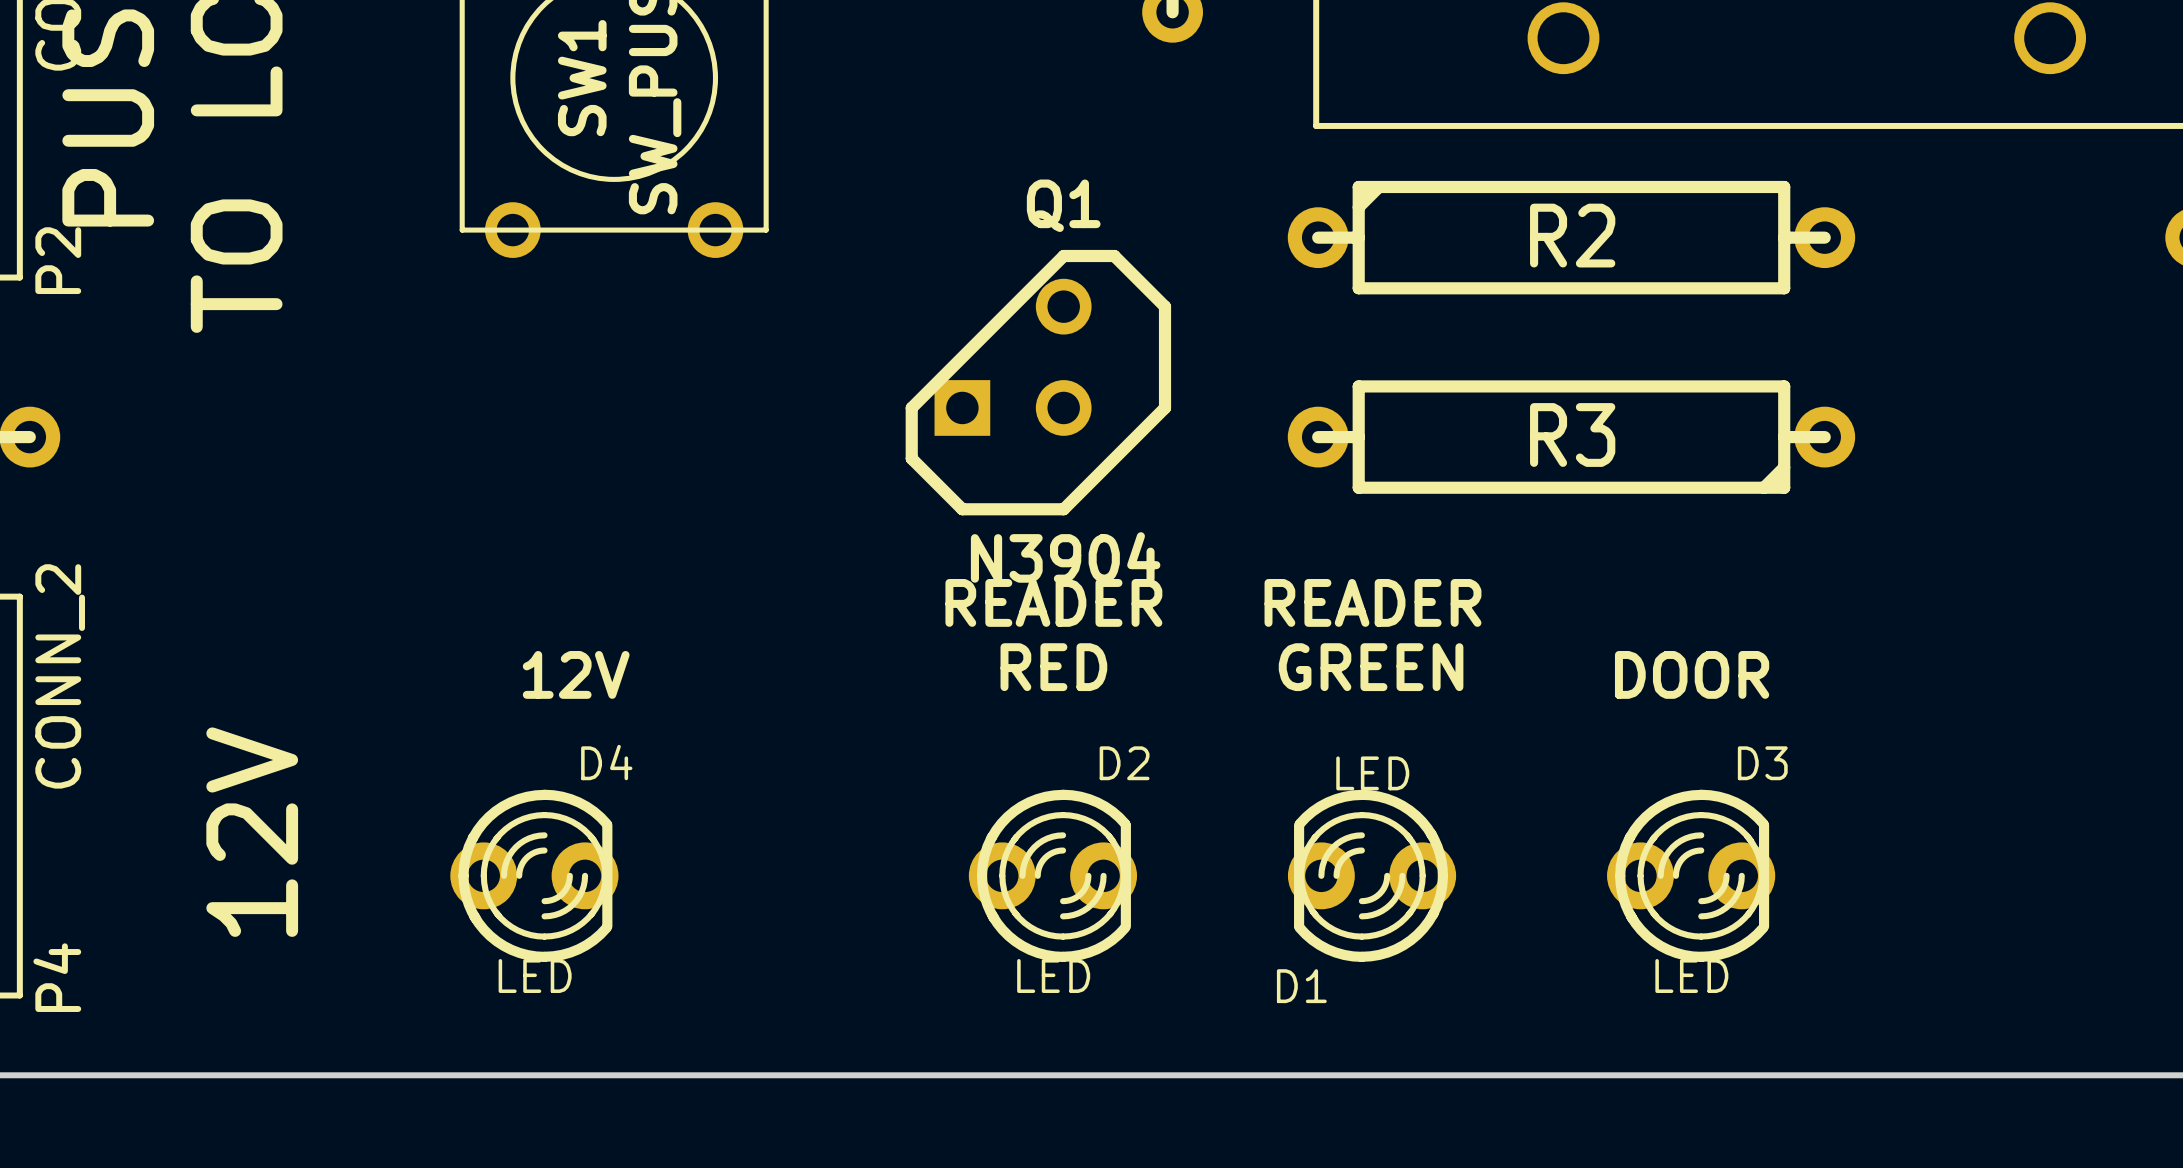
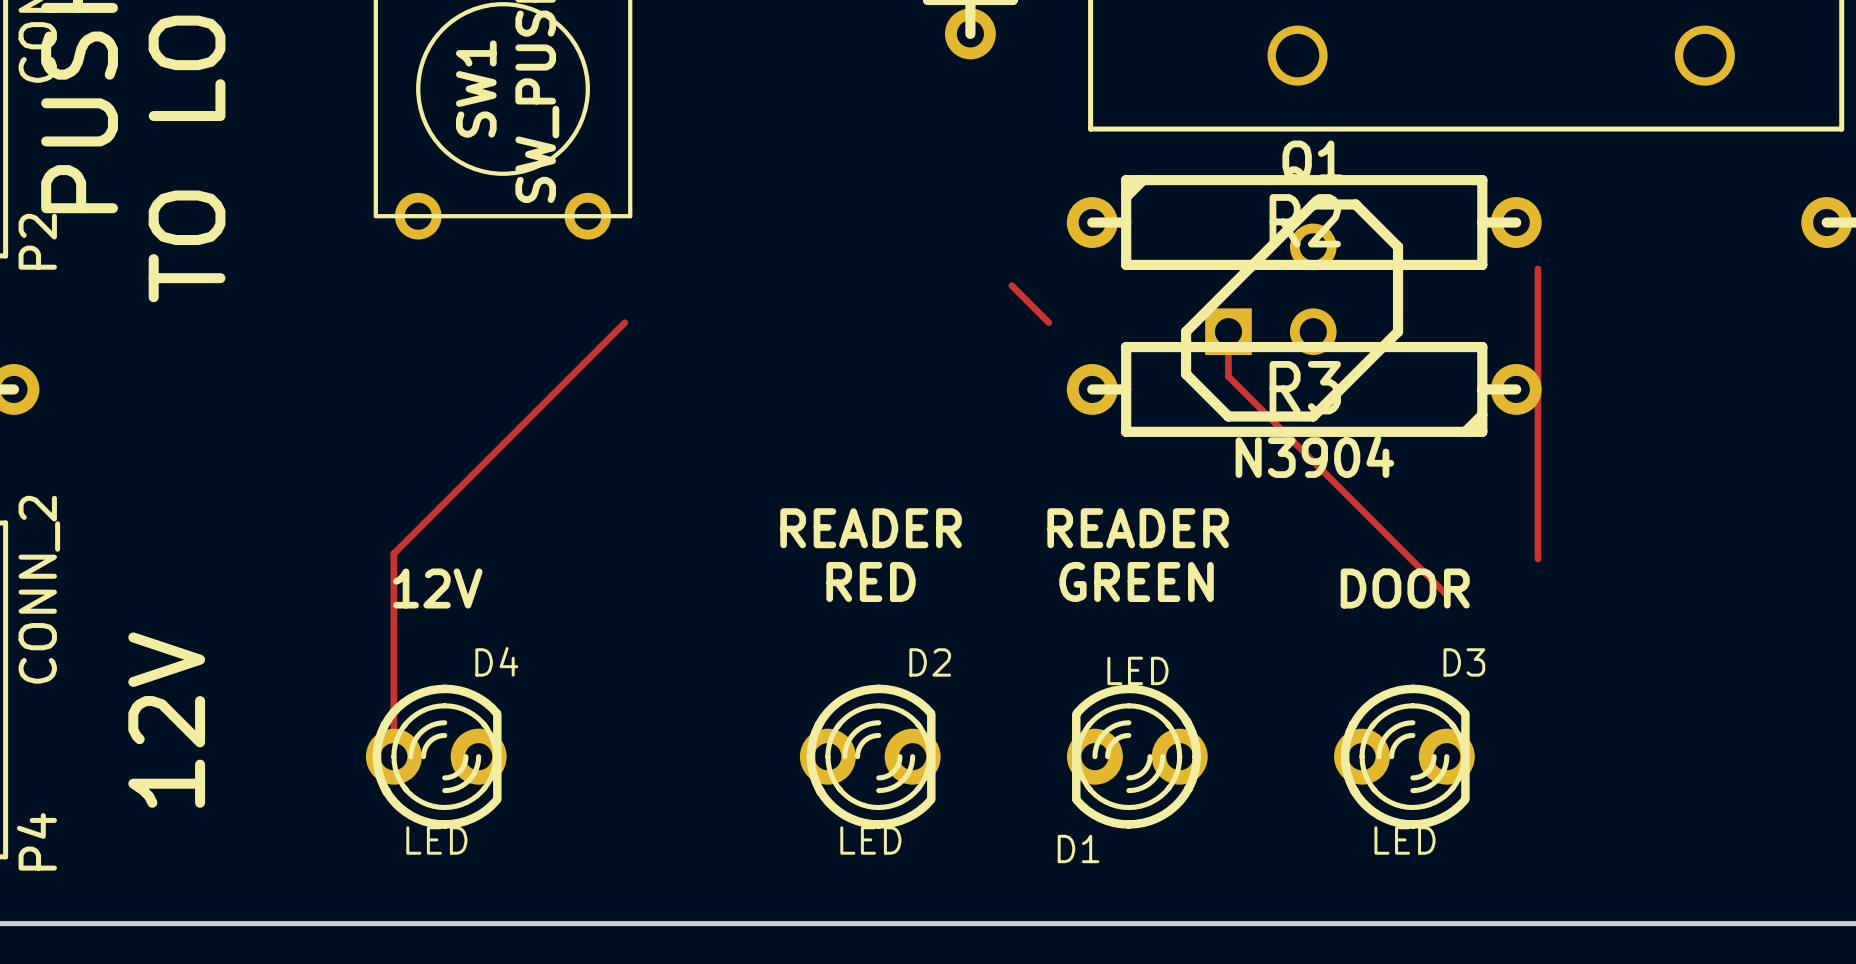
top track: none -> (1537, 268) (1537, 559)
top track: none -> (1011, 285) (1048, 322)
top track: none -> (624, 322) (393, 553) (393, 756)
top track: none -> (1228, 331) (1228, 376) (1446, 594)
Q1 position: (1038, 382) -> (1292, 310)
text position: 12V (576, 674) -> 12V (437, 588)
text position: 12V (252, 832) -> 12V (166, 720)

